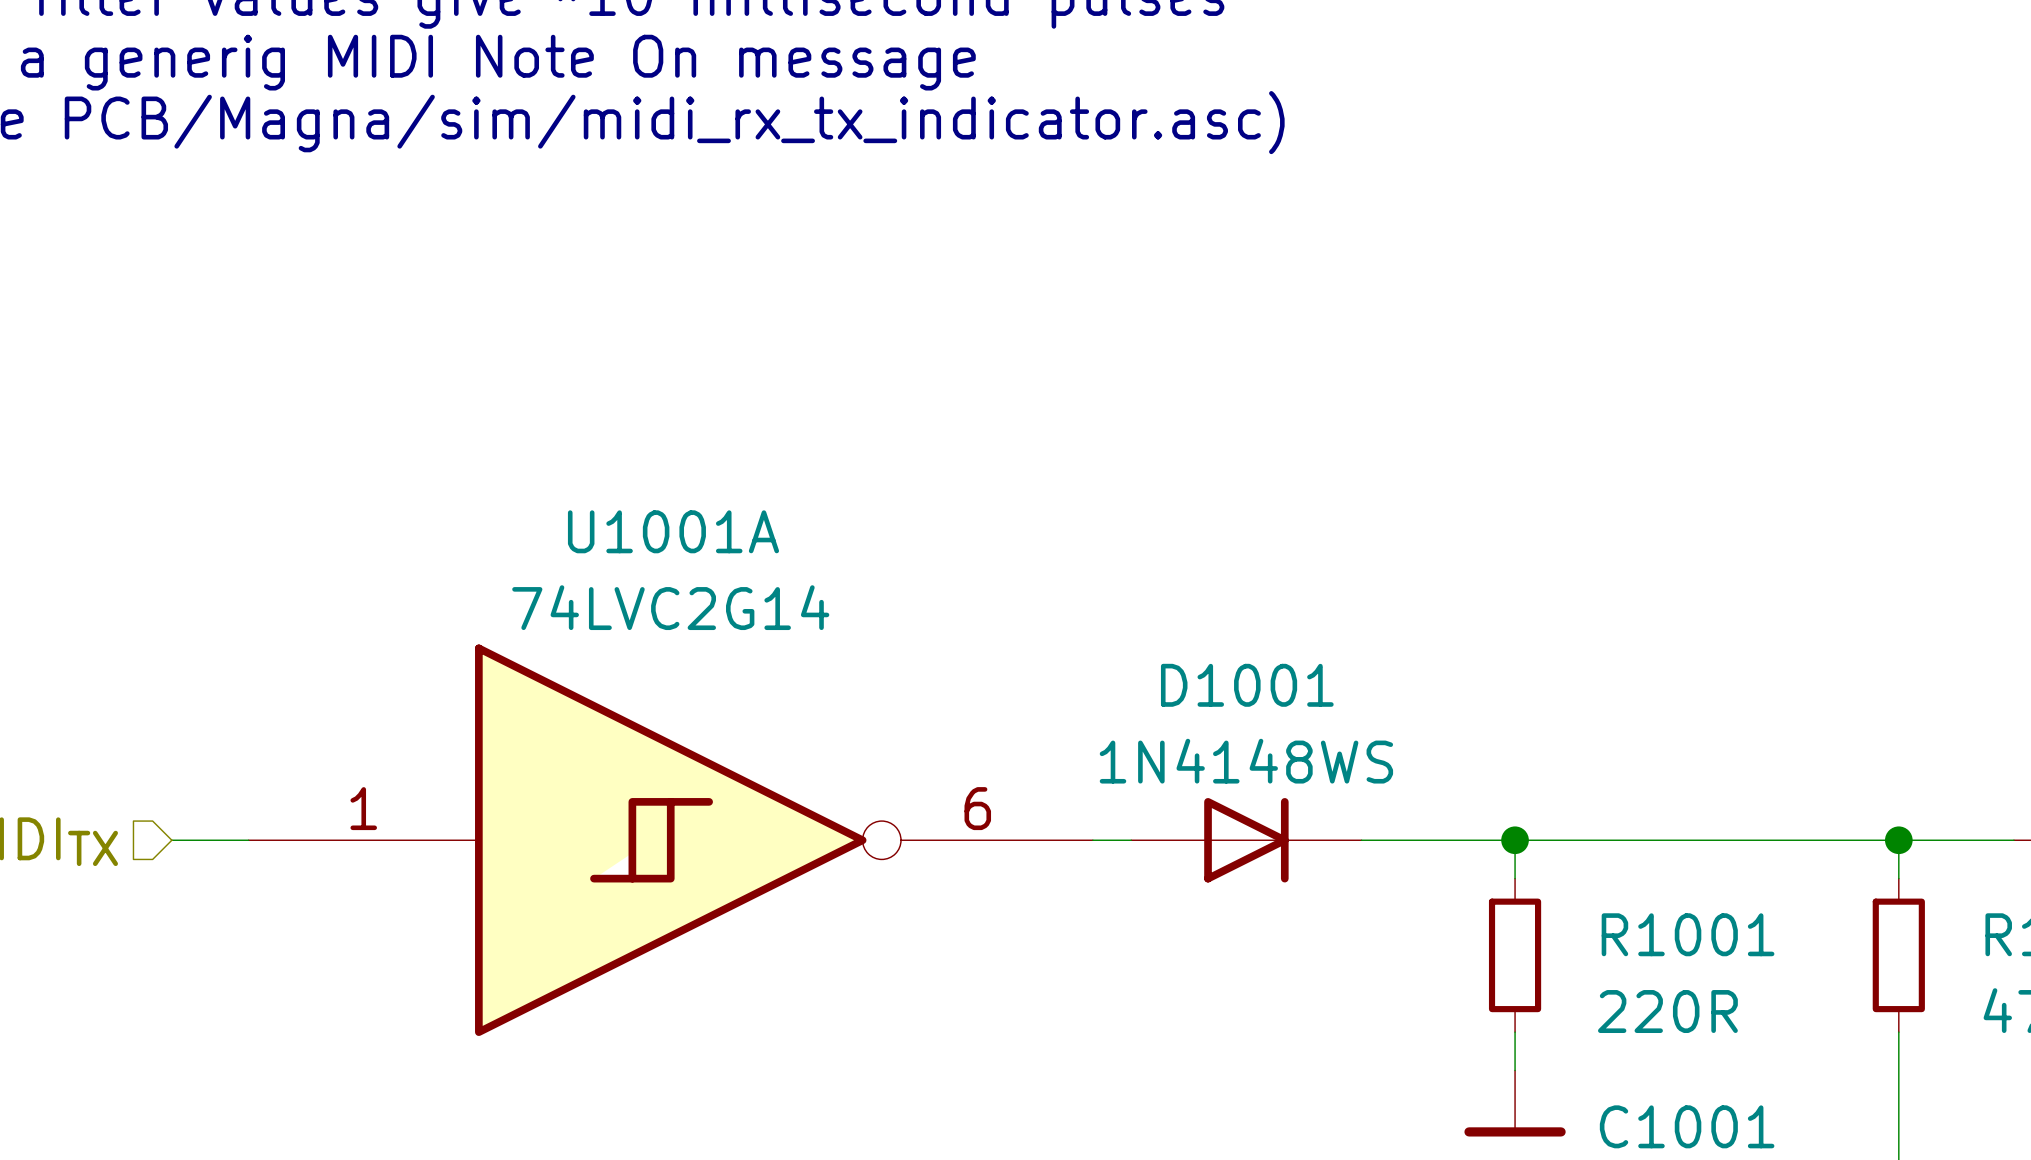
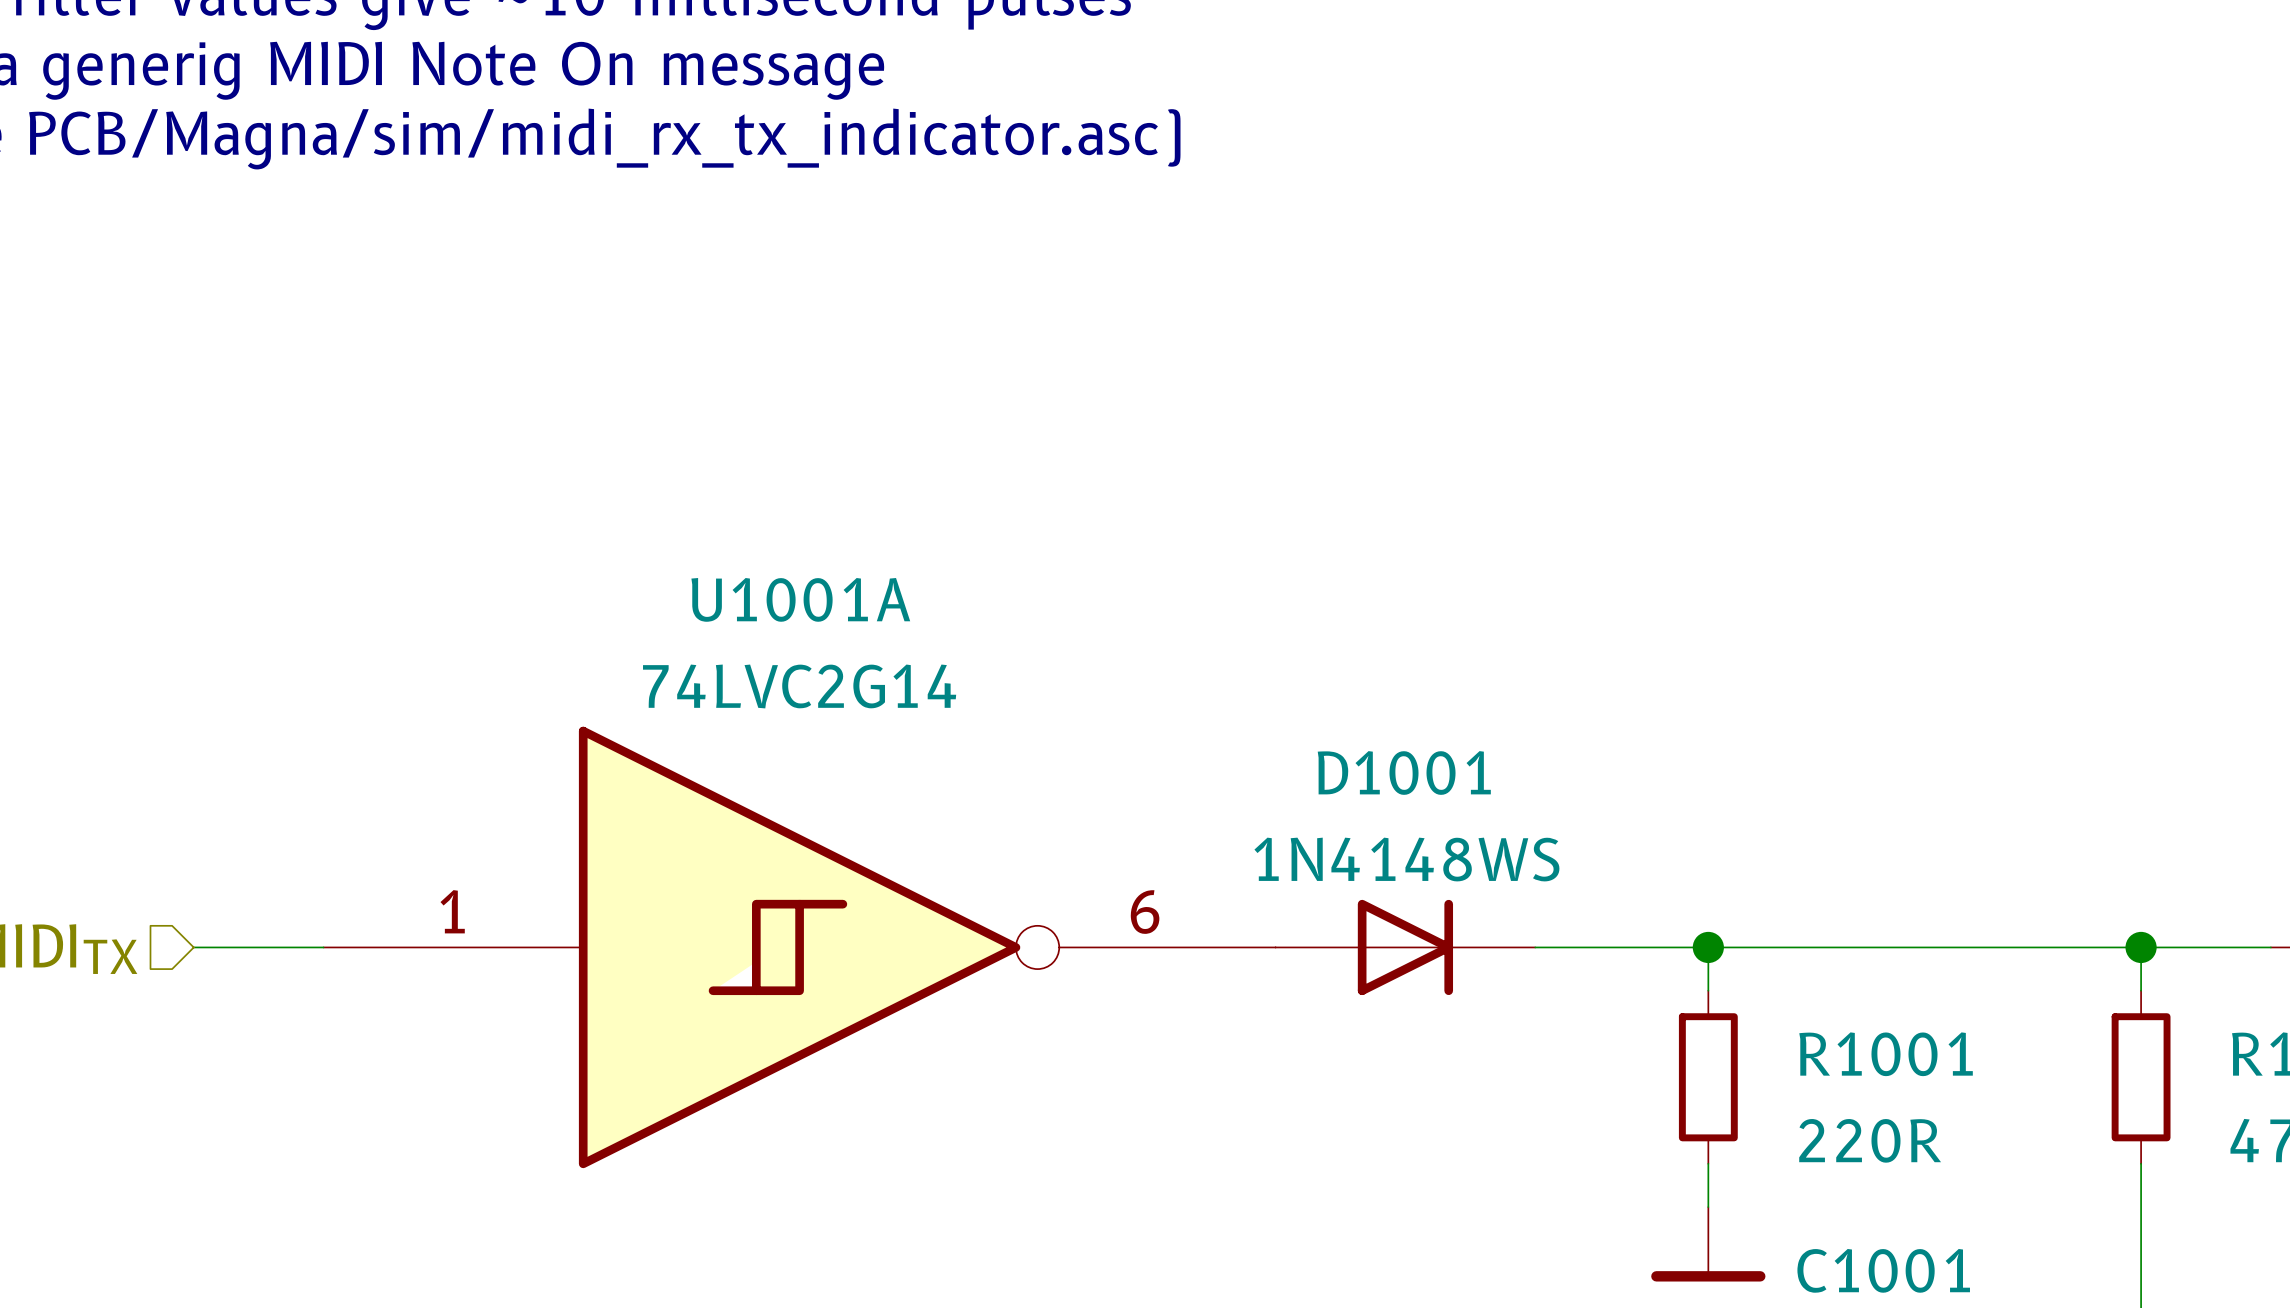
U1001A position: (670, 840) -> (799, 947)

